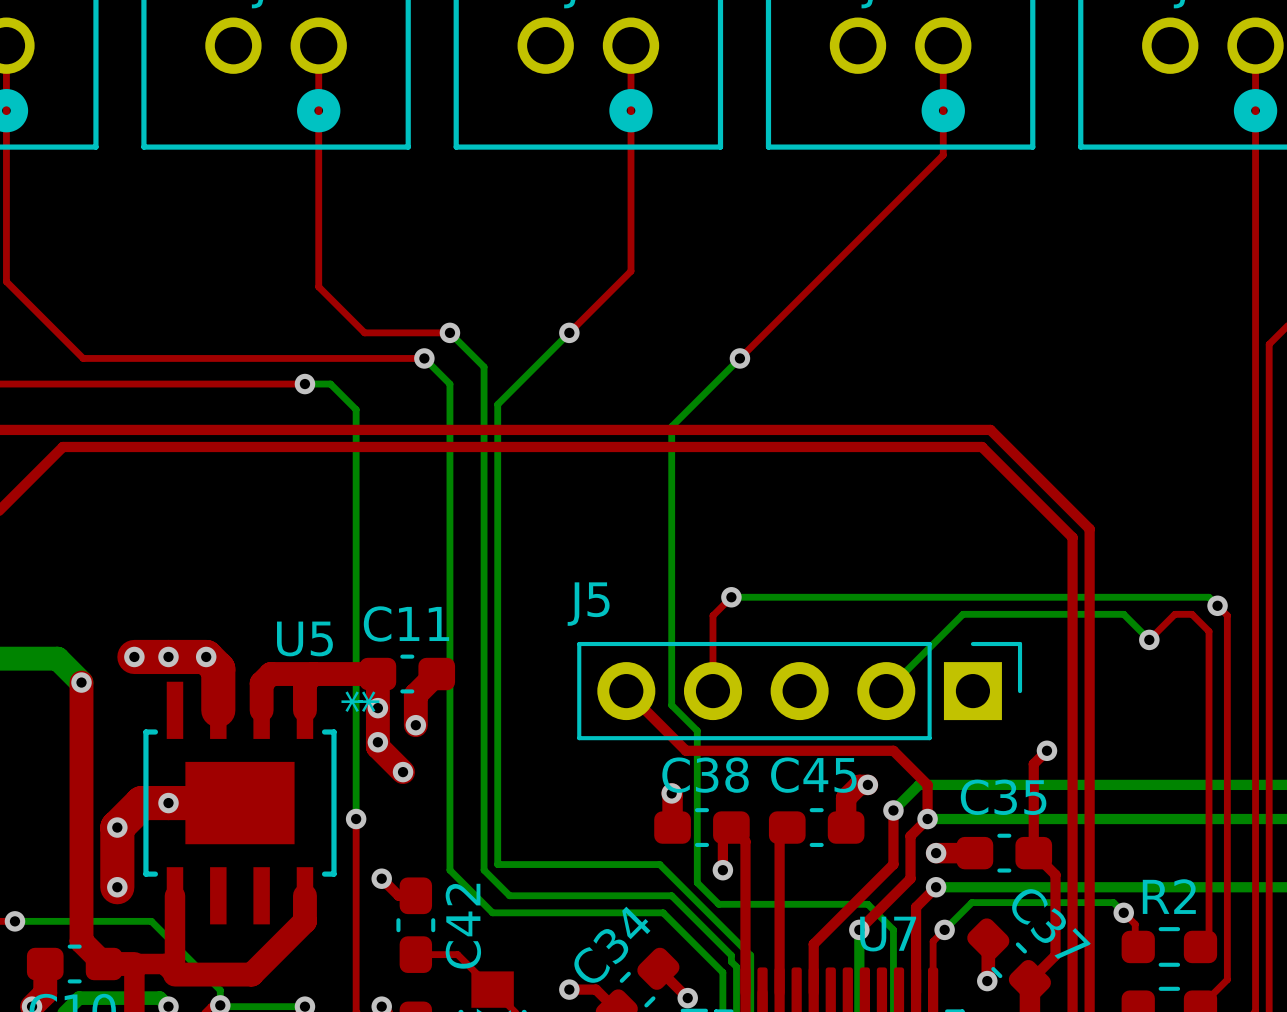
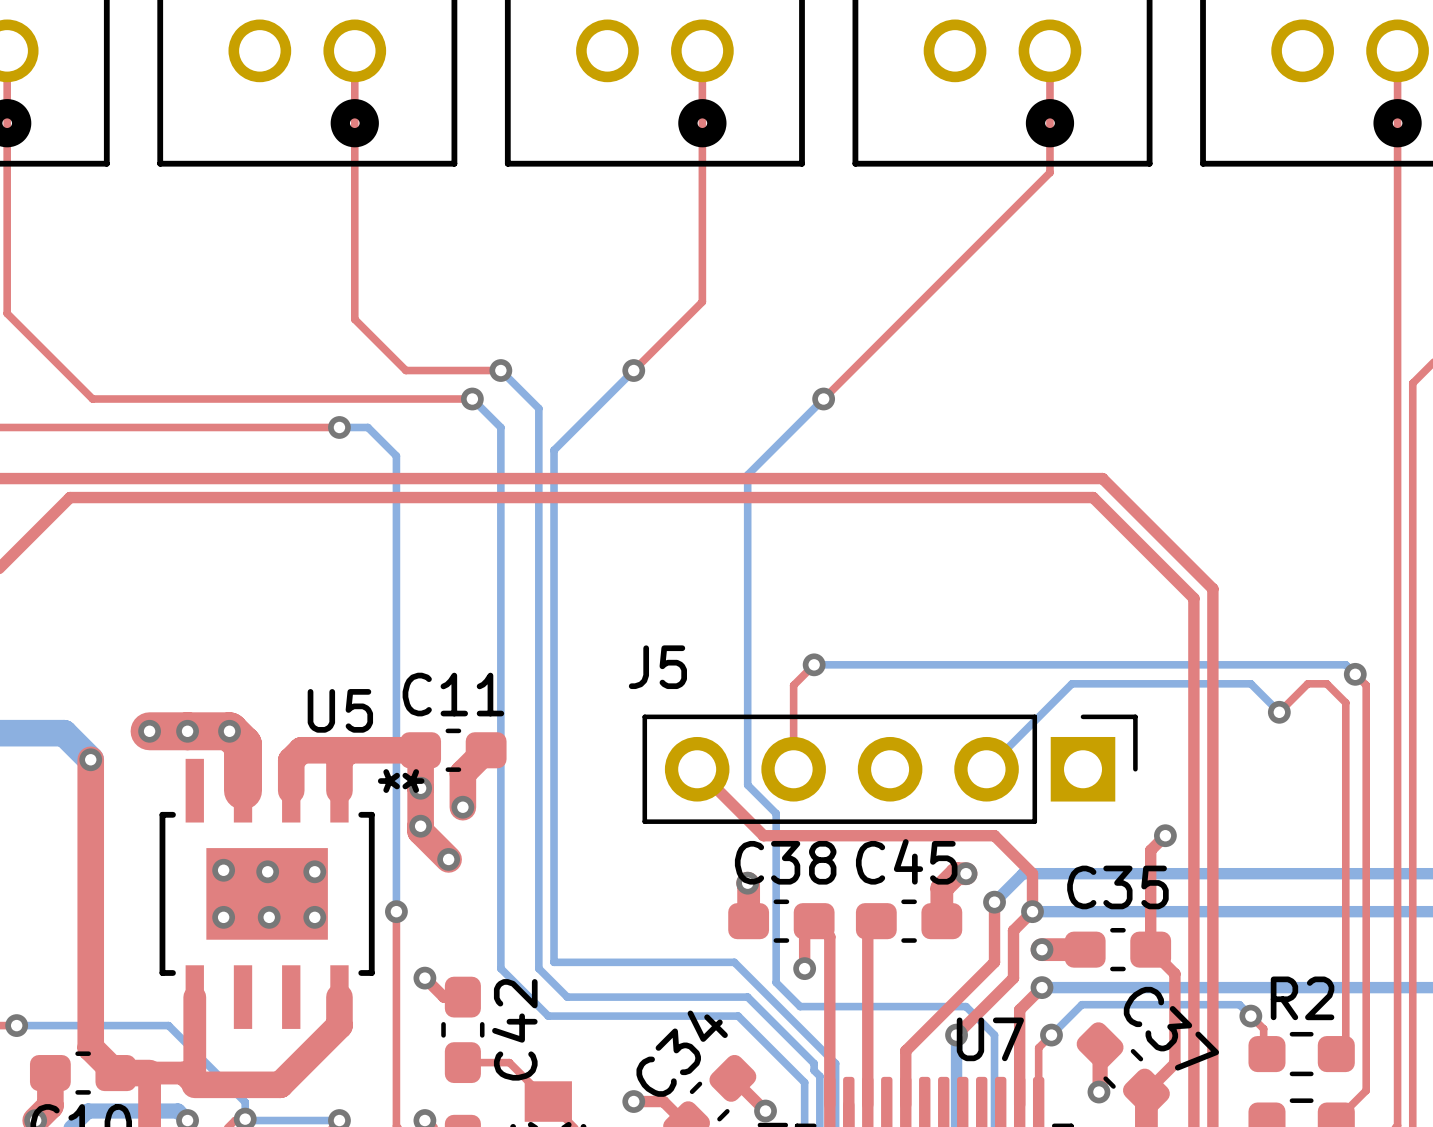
via: none -> (223, 870)
via: none -> (267, 871)
via: none -> (314, 871)
via: (168, 803) -> none
top track: (239, 803) (141, 803) (117, 827) (117, 887) -> none
via: none -> (223, 917)
via: none -> (269, 917)
via: none -> (314, 917)
via: (117, 827) -> none
via: (117, 887) -> none

